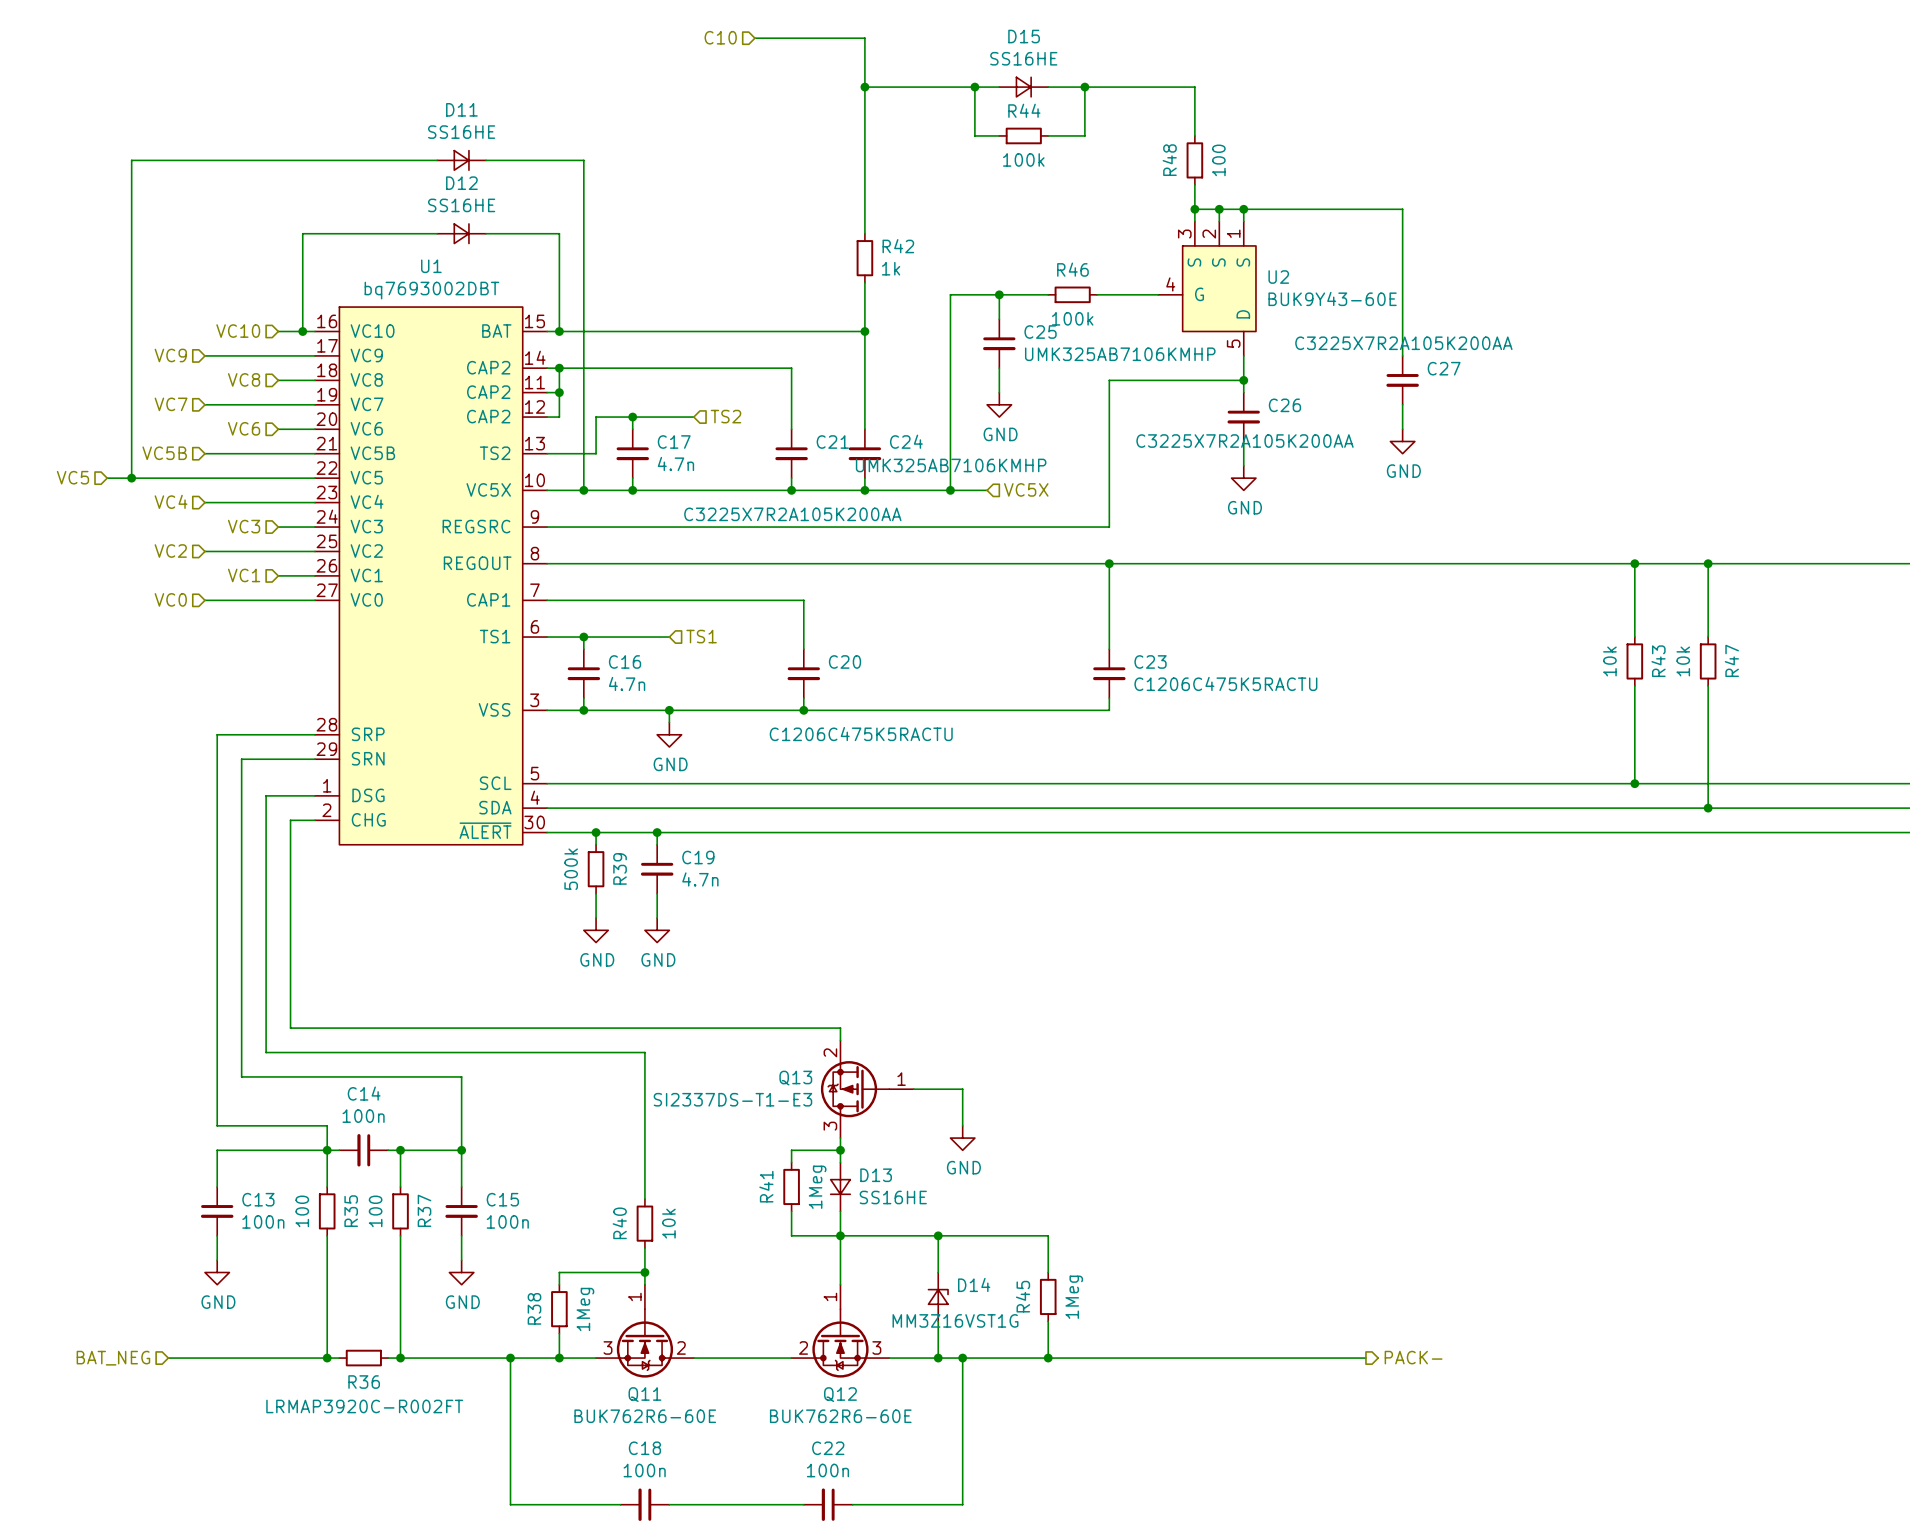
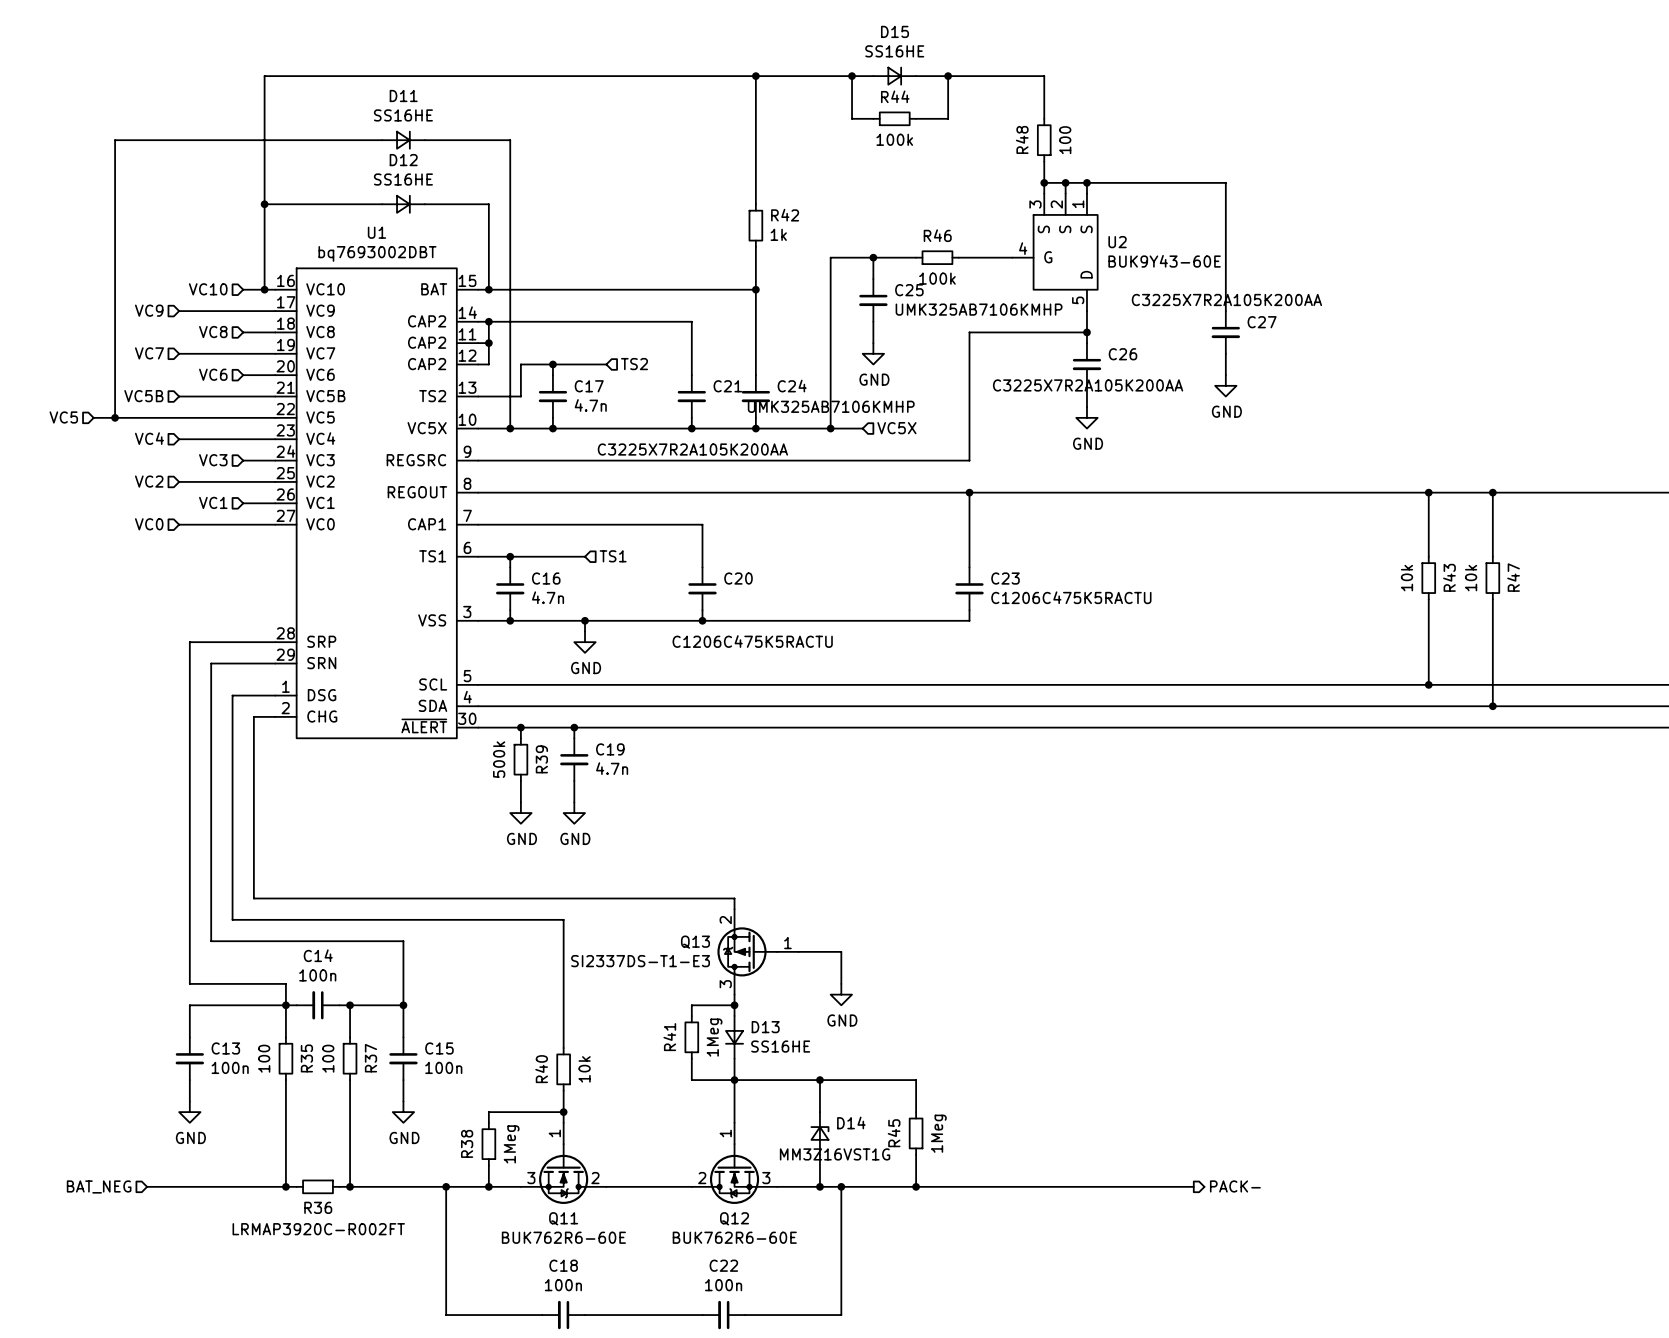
hierarchical label: C10 (720, 37) -> none
wire: (754, 38) (864, 38) (864, 87) -> (264, 204) (264, 76) (755, 76)
junction: none -> (264, 204)

